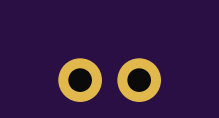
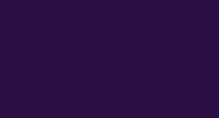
part: (109, 80) -> none

